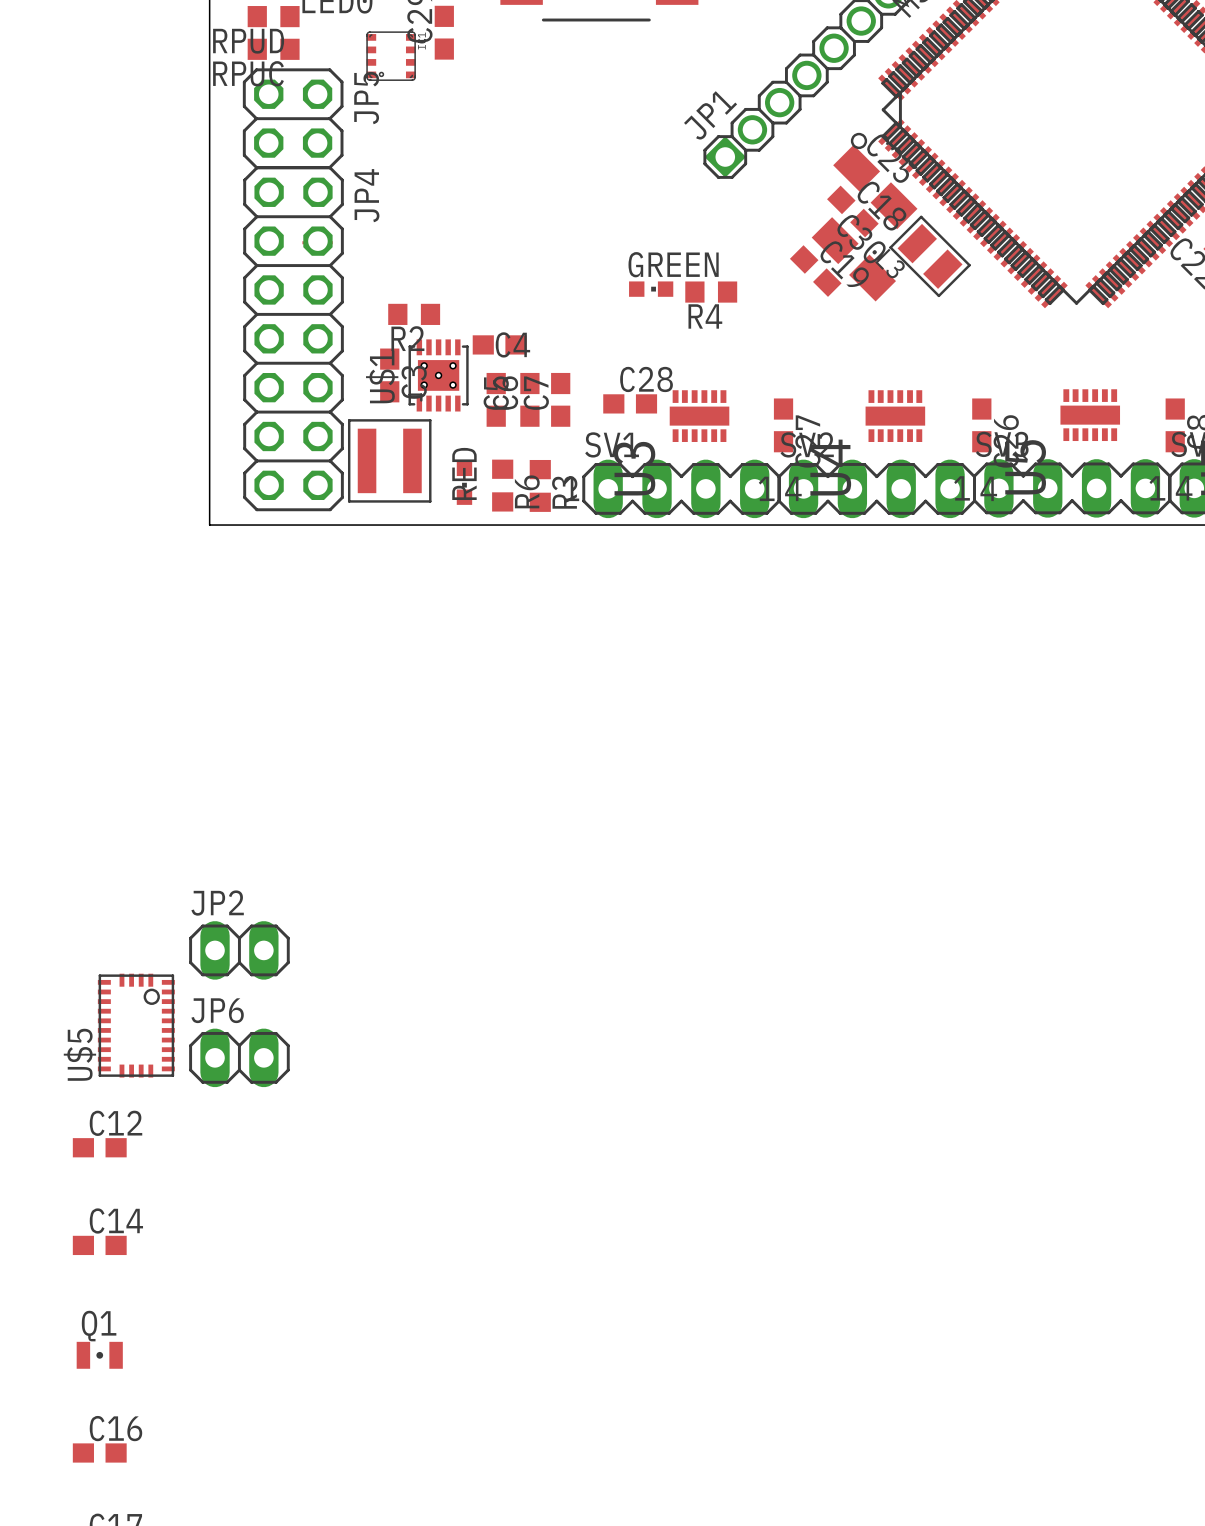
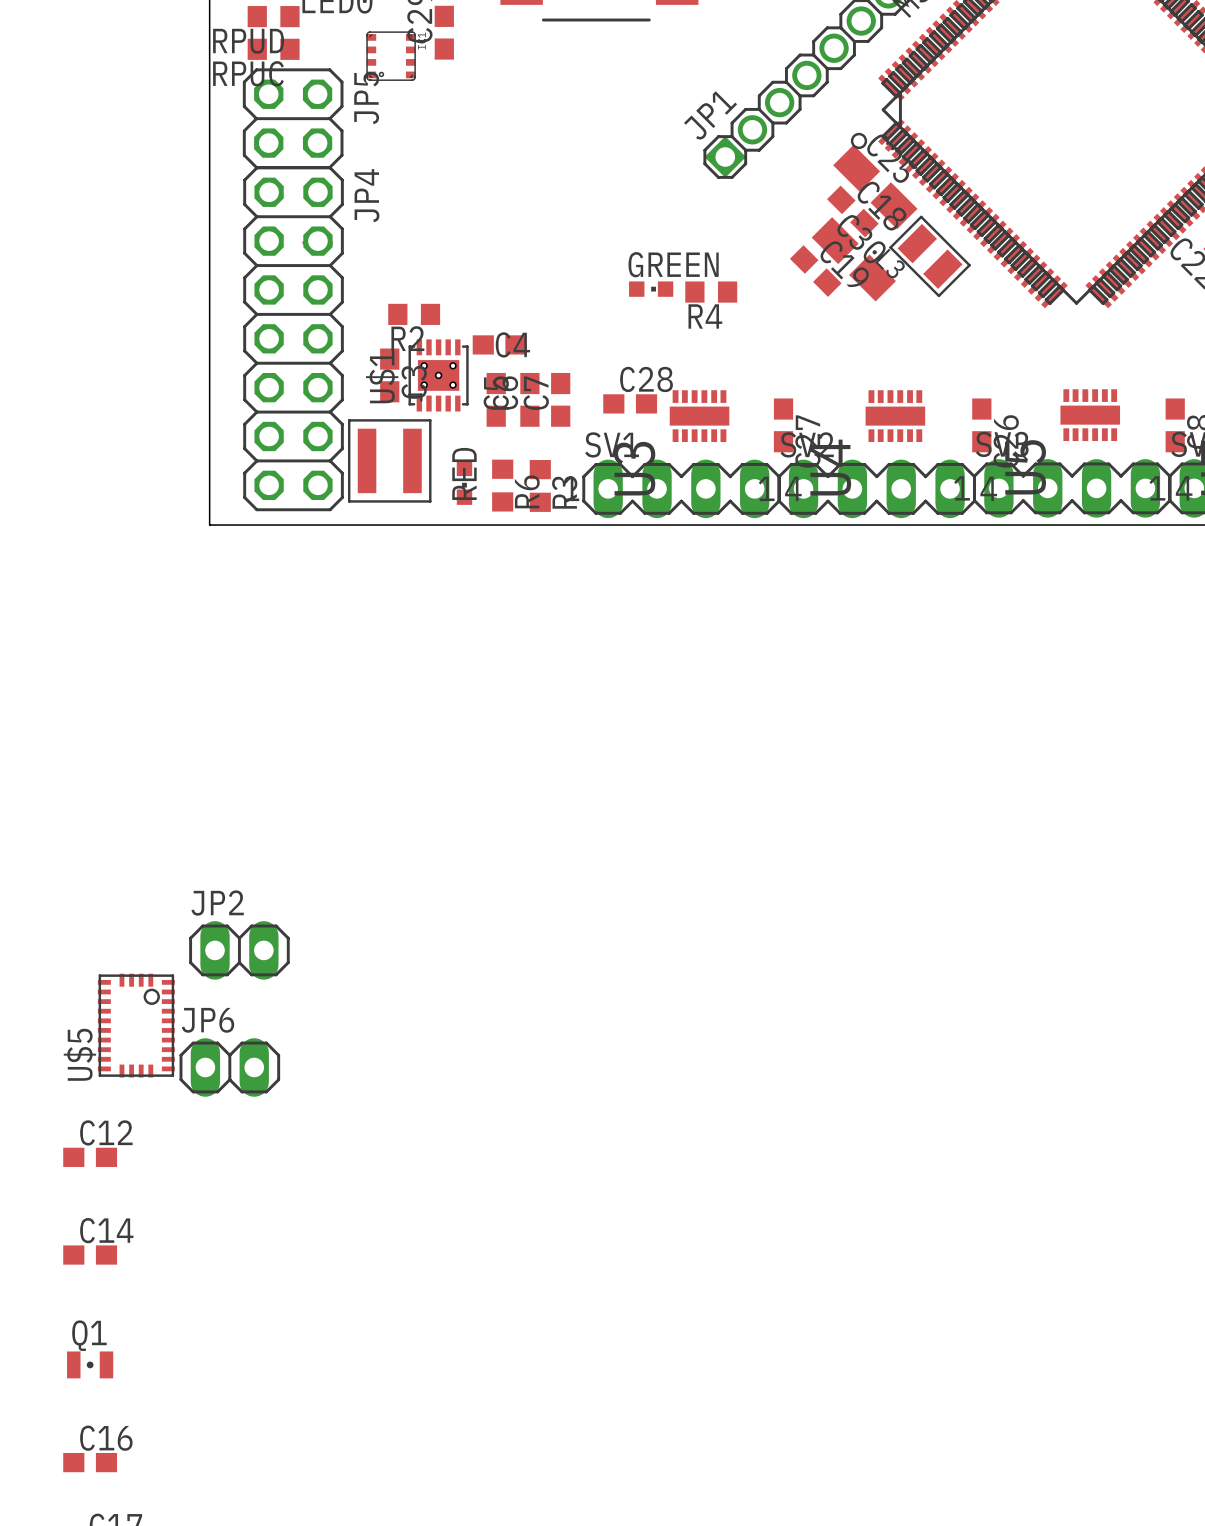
JP6 position: (239, 1057) -> (229, 1067)
C12 position: (99, 1147) -> (90, 1157)
C14 position: (99, 1245) -> (90, 1255)
Q1 position: (99, 1355) -> (90, 1364)
C16 position: (99, 1452) -> (90, 1462)

